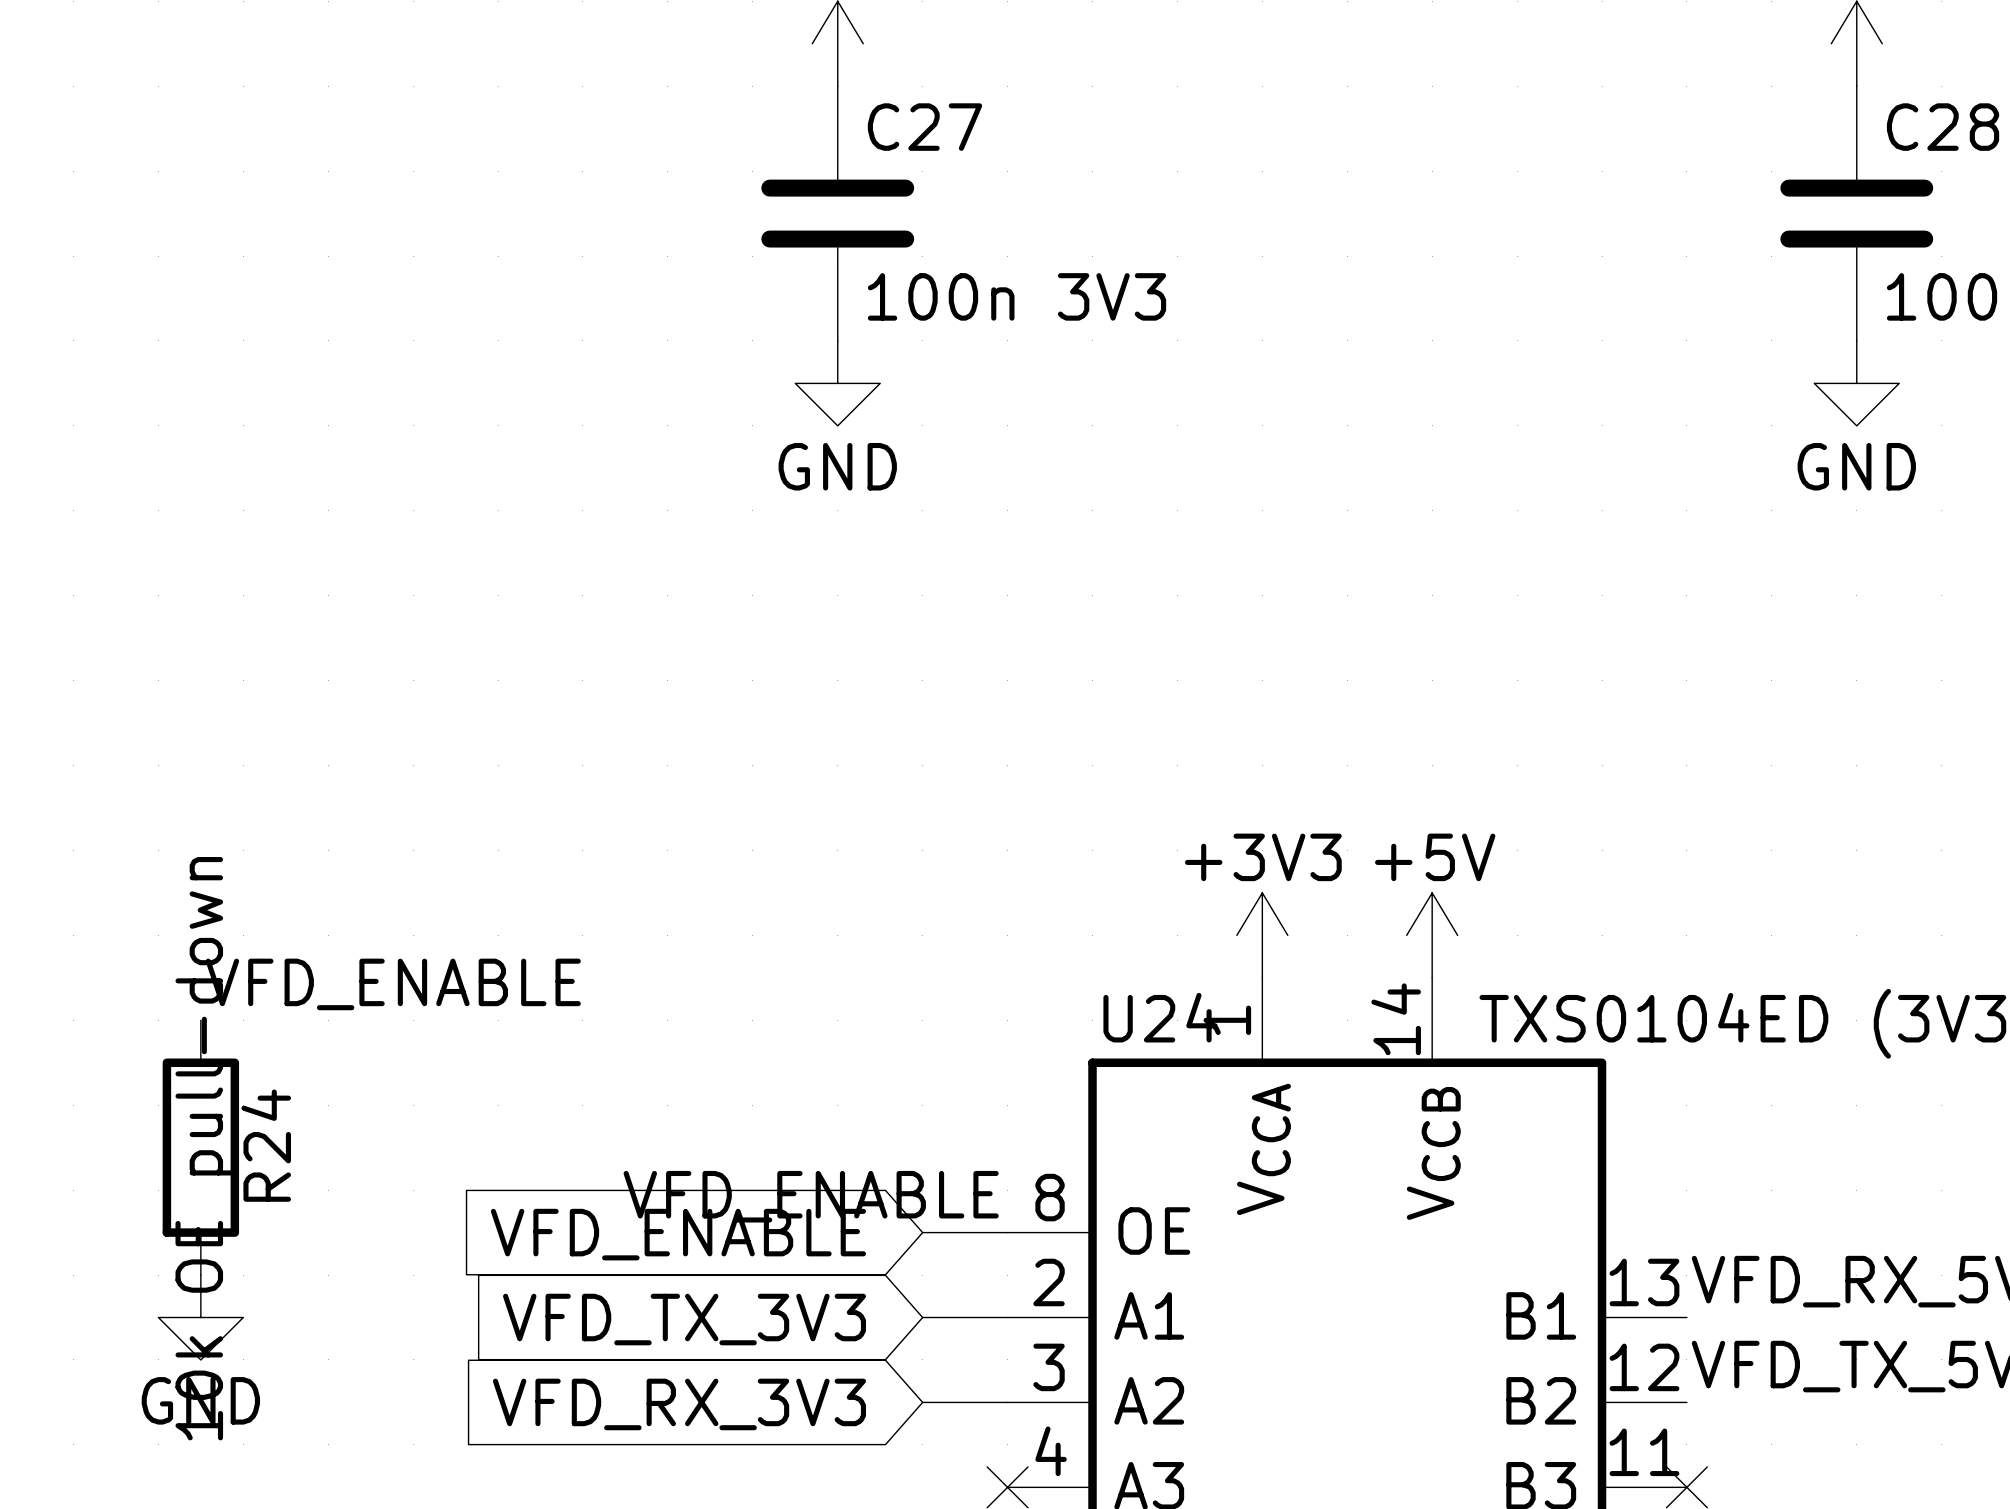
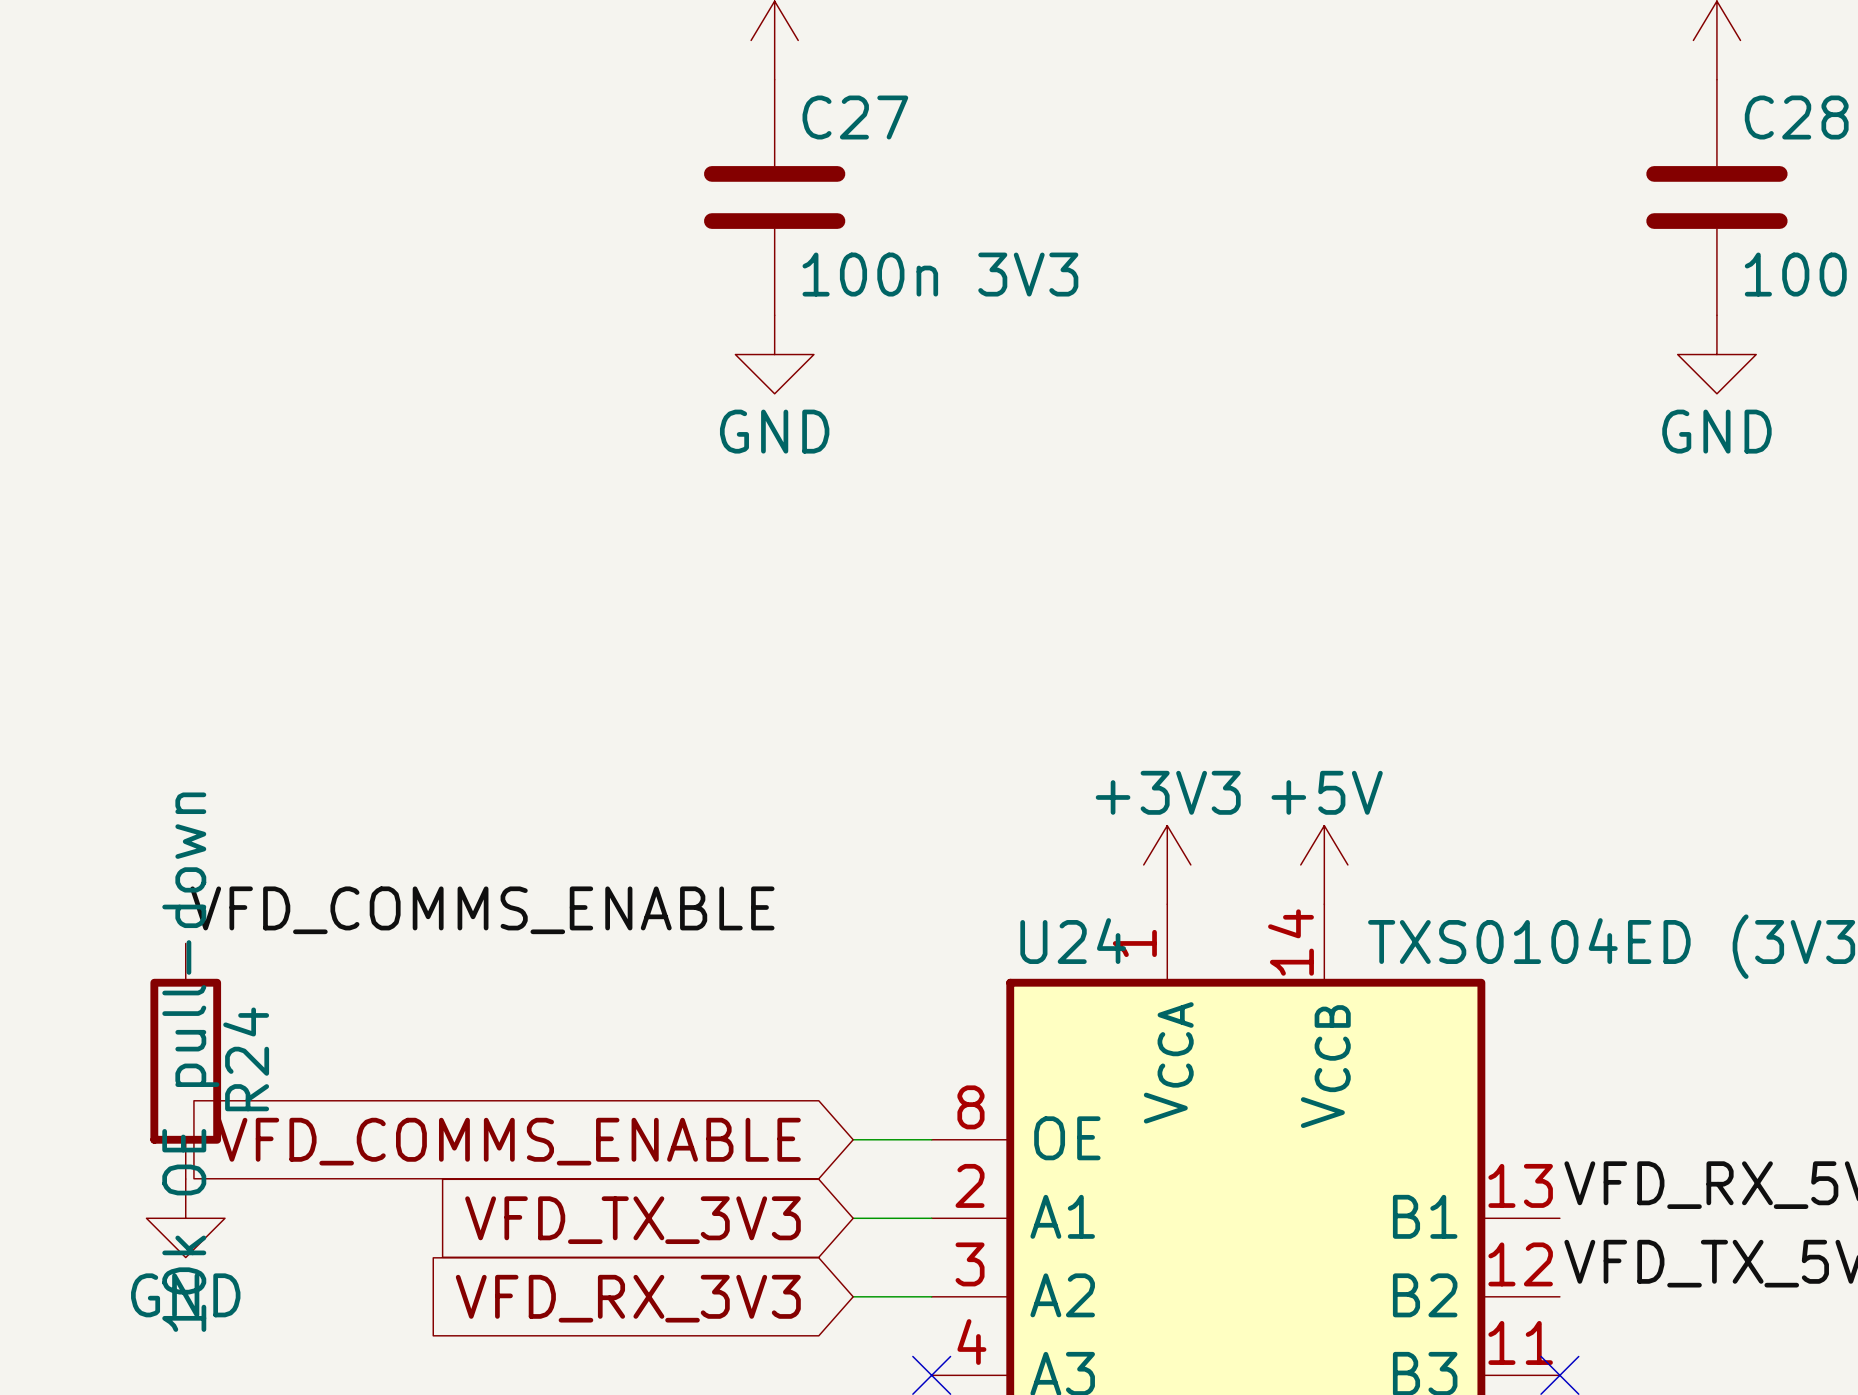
label: VFD_ENABLE (393, 984) -> VFD_COMMS_ENABLE (482, 910)
label: VFD_ENABLE (811, 1196) -> none
global label: VFD_ENABLE (678, 1234) -> VFD_COMMS_ENABLE (508, 1141)

